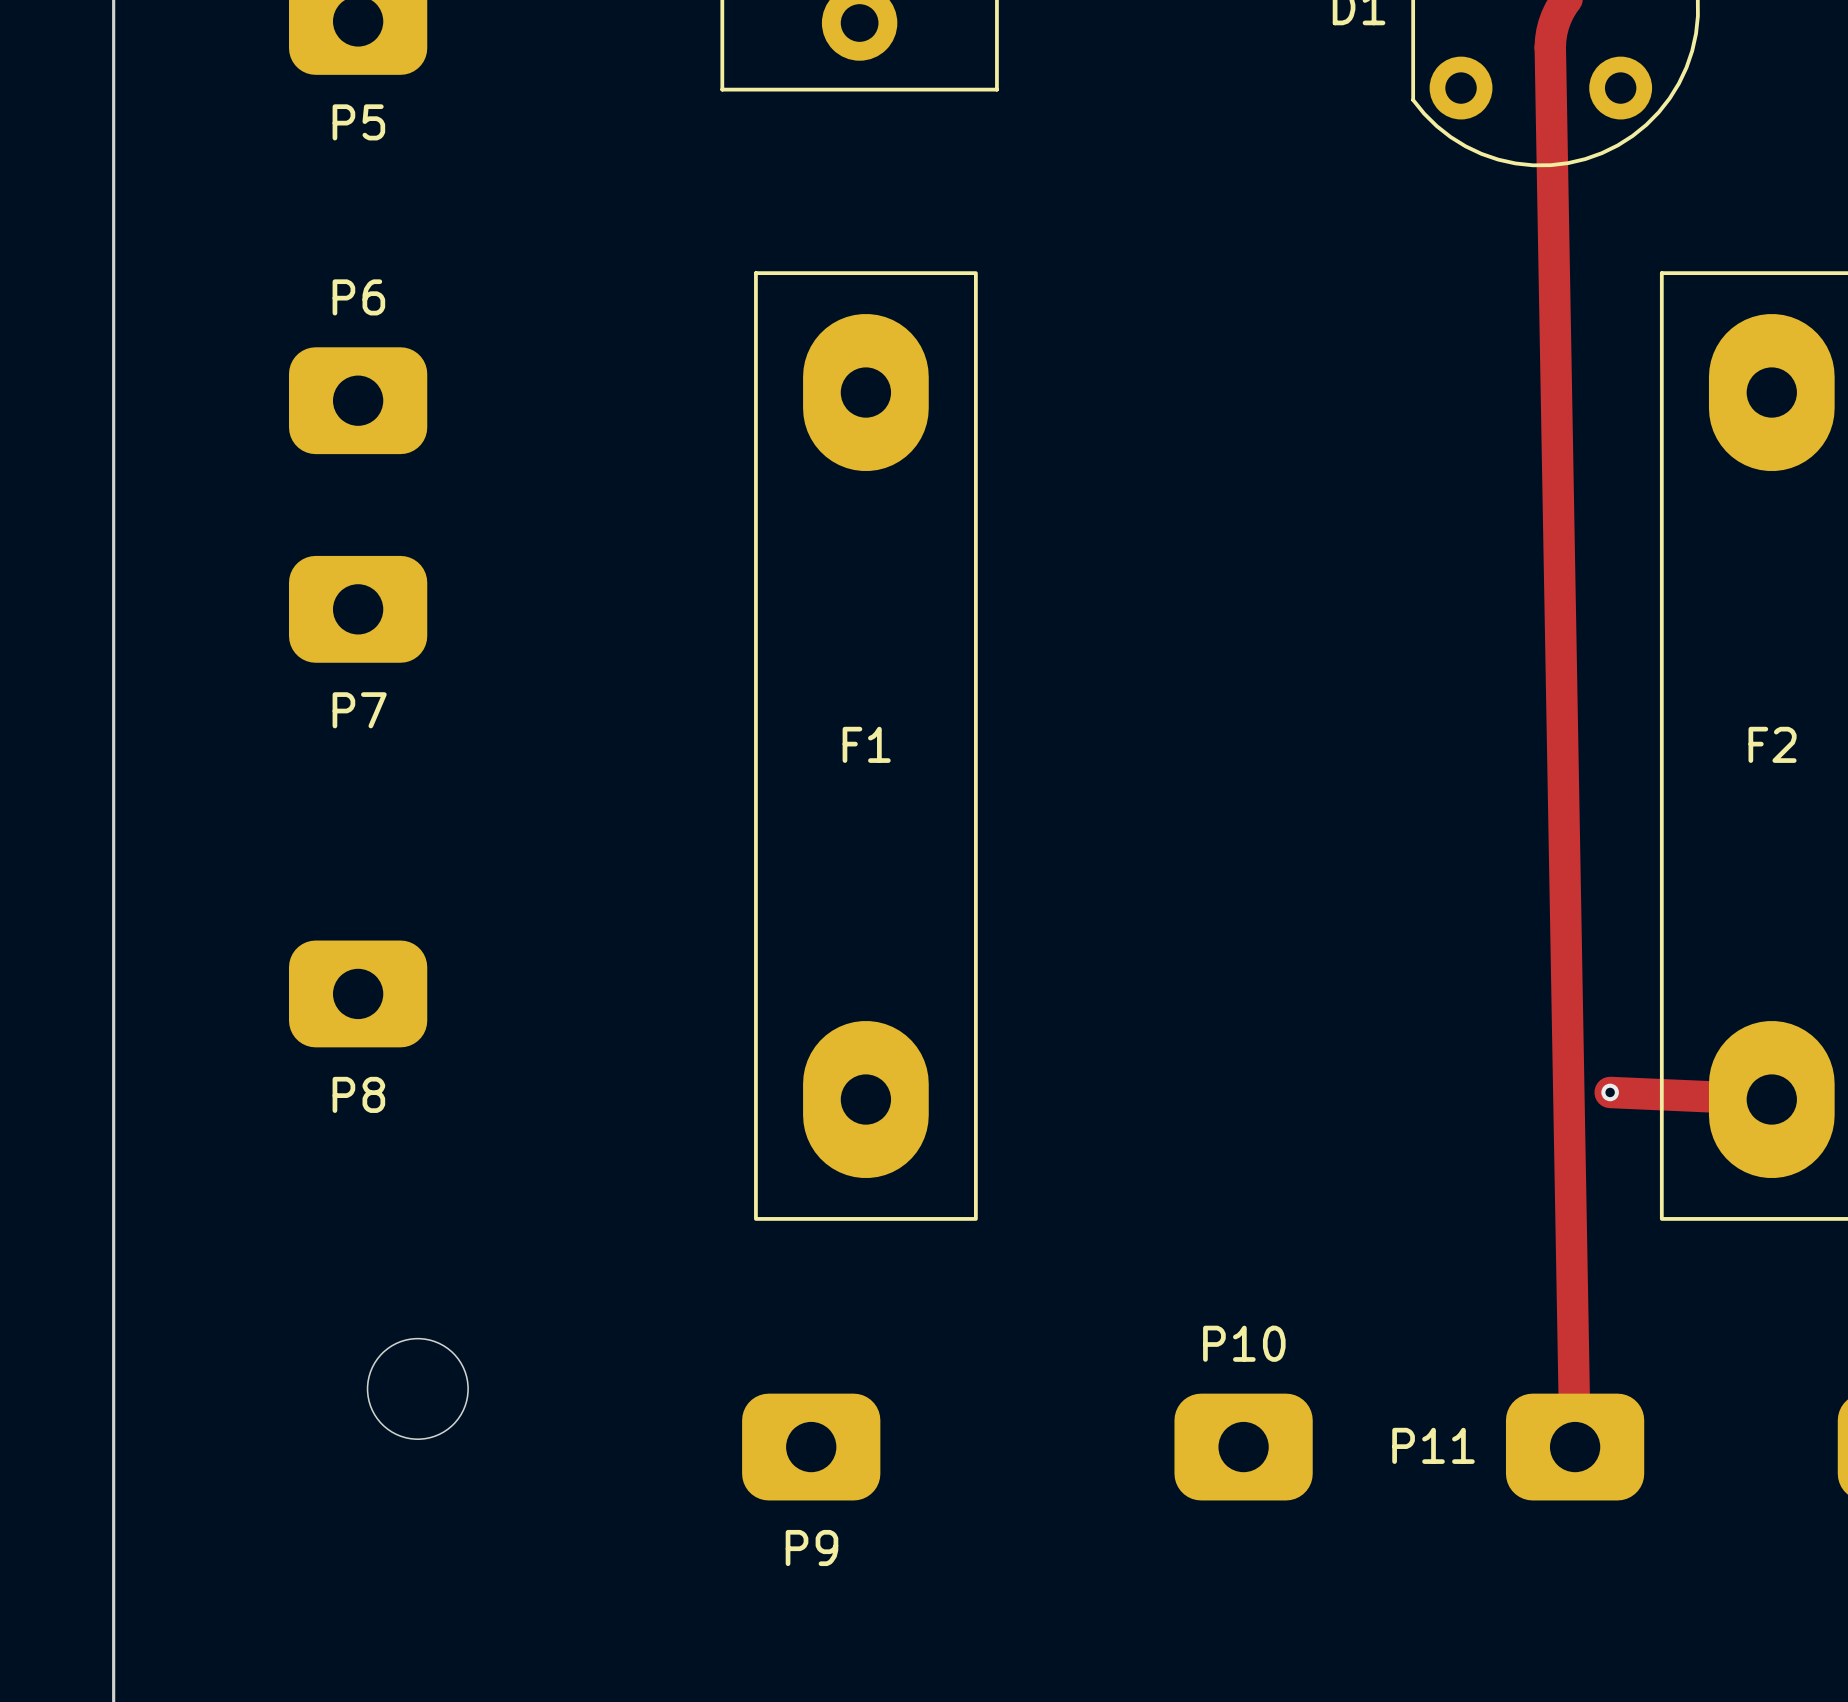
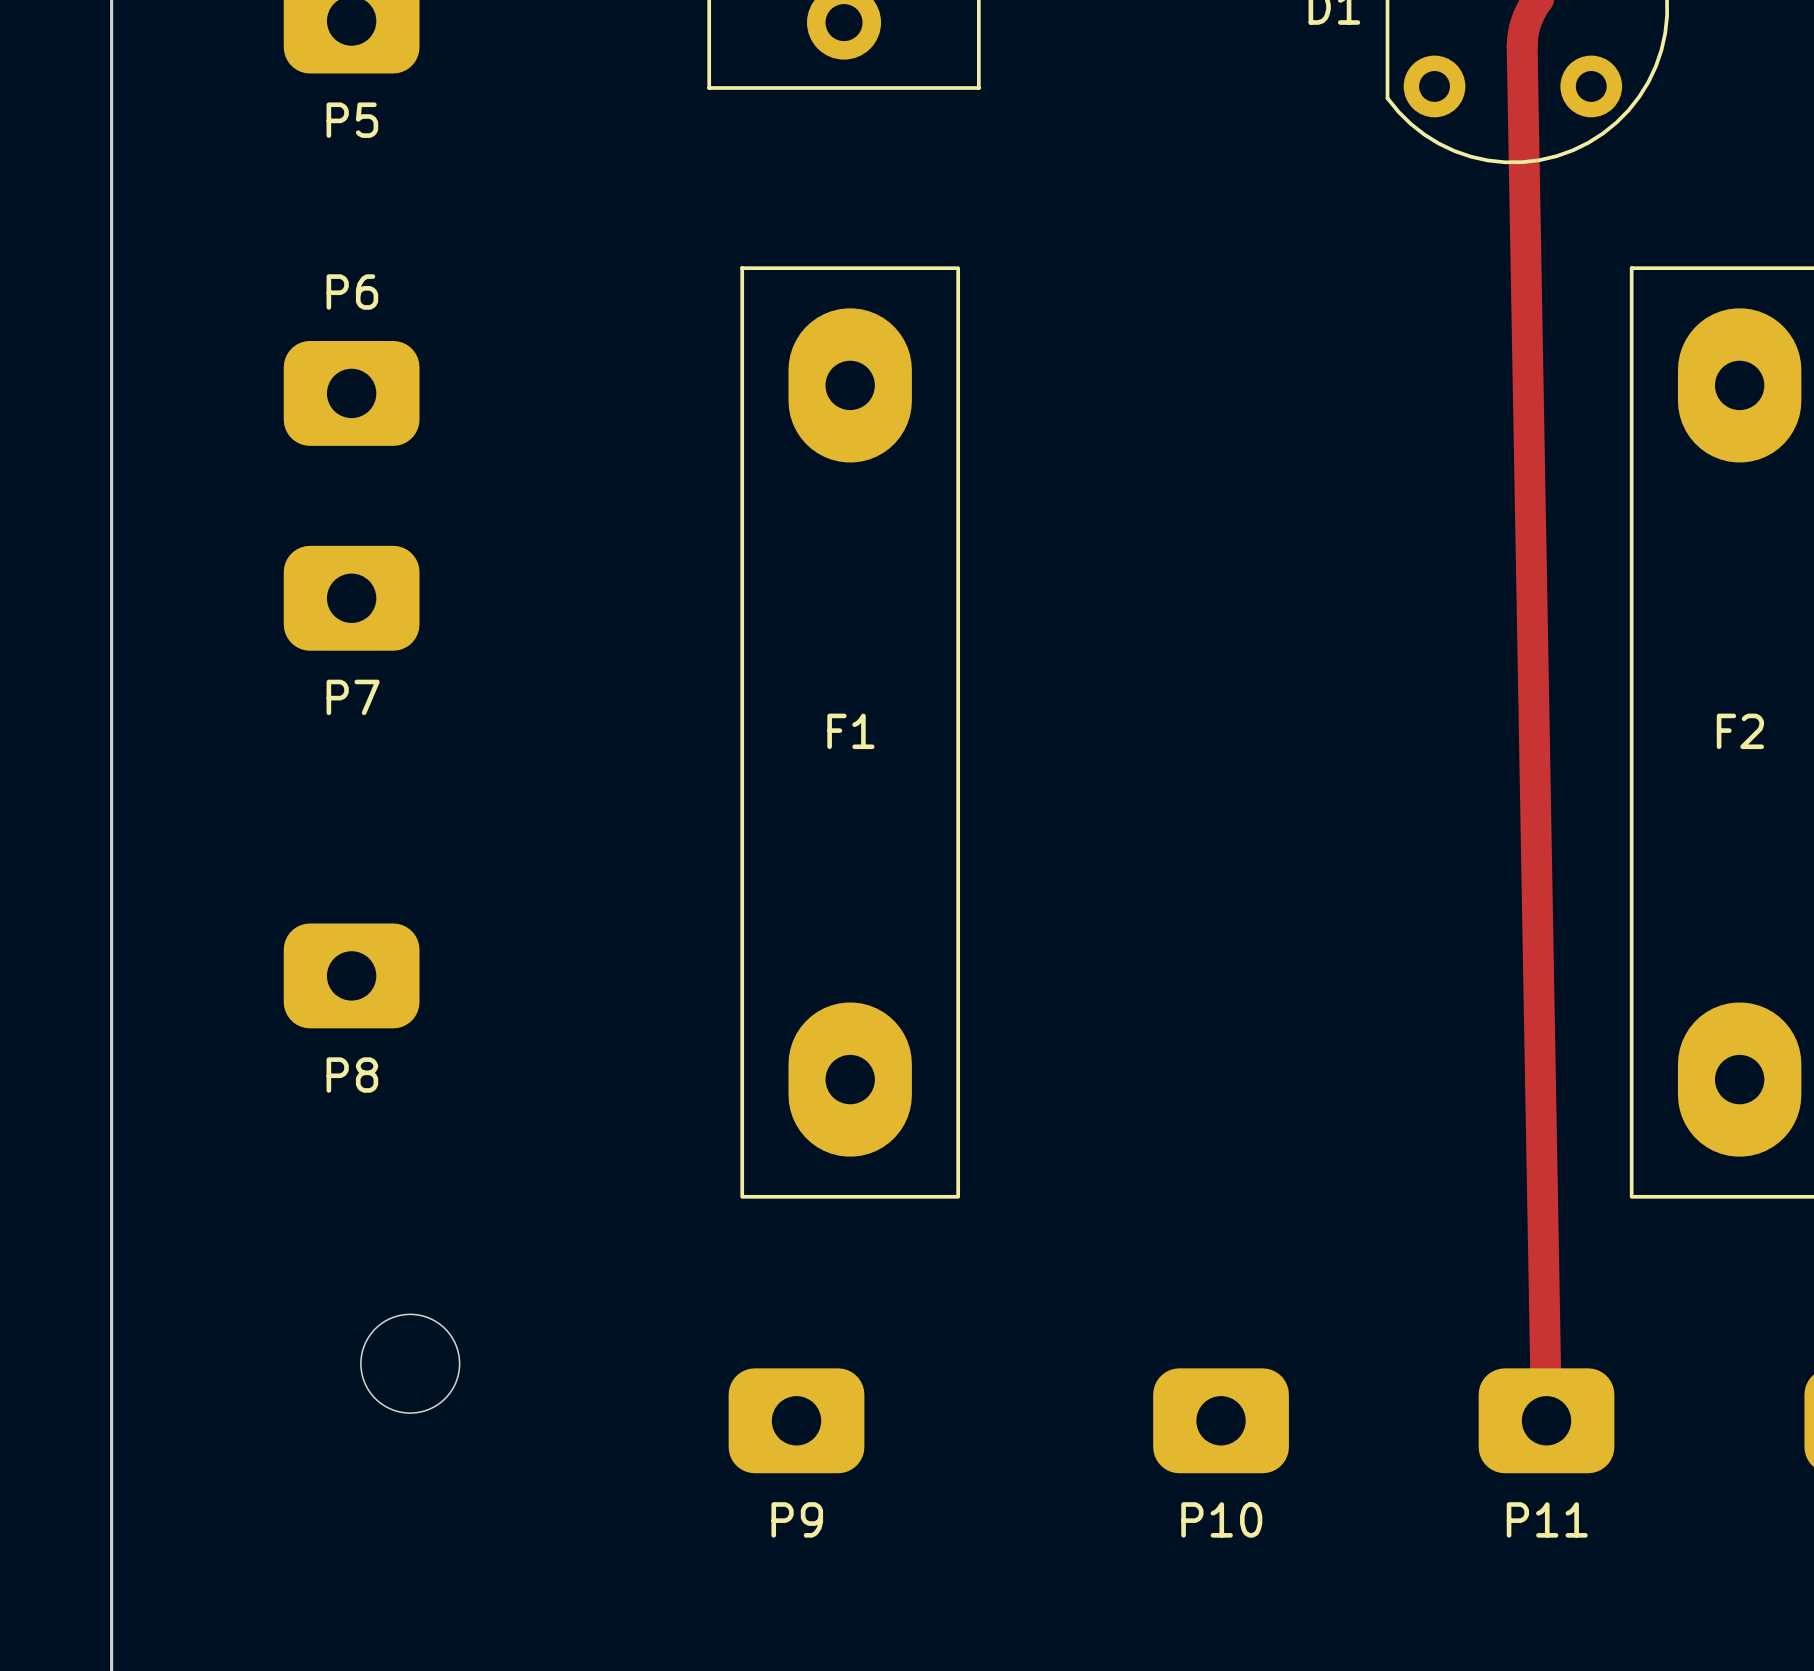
track: (1610, 1092) (1771, 1099) -> none
via: (1610, 1092) -> none
P10 name position: P10 (1244, 1343) -> P10 (1221, 1519)
P11 name position: P11 (1433, 1445) -> P11 (1547, 1519)

